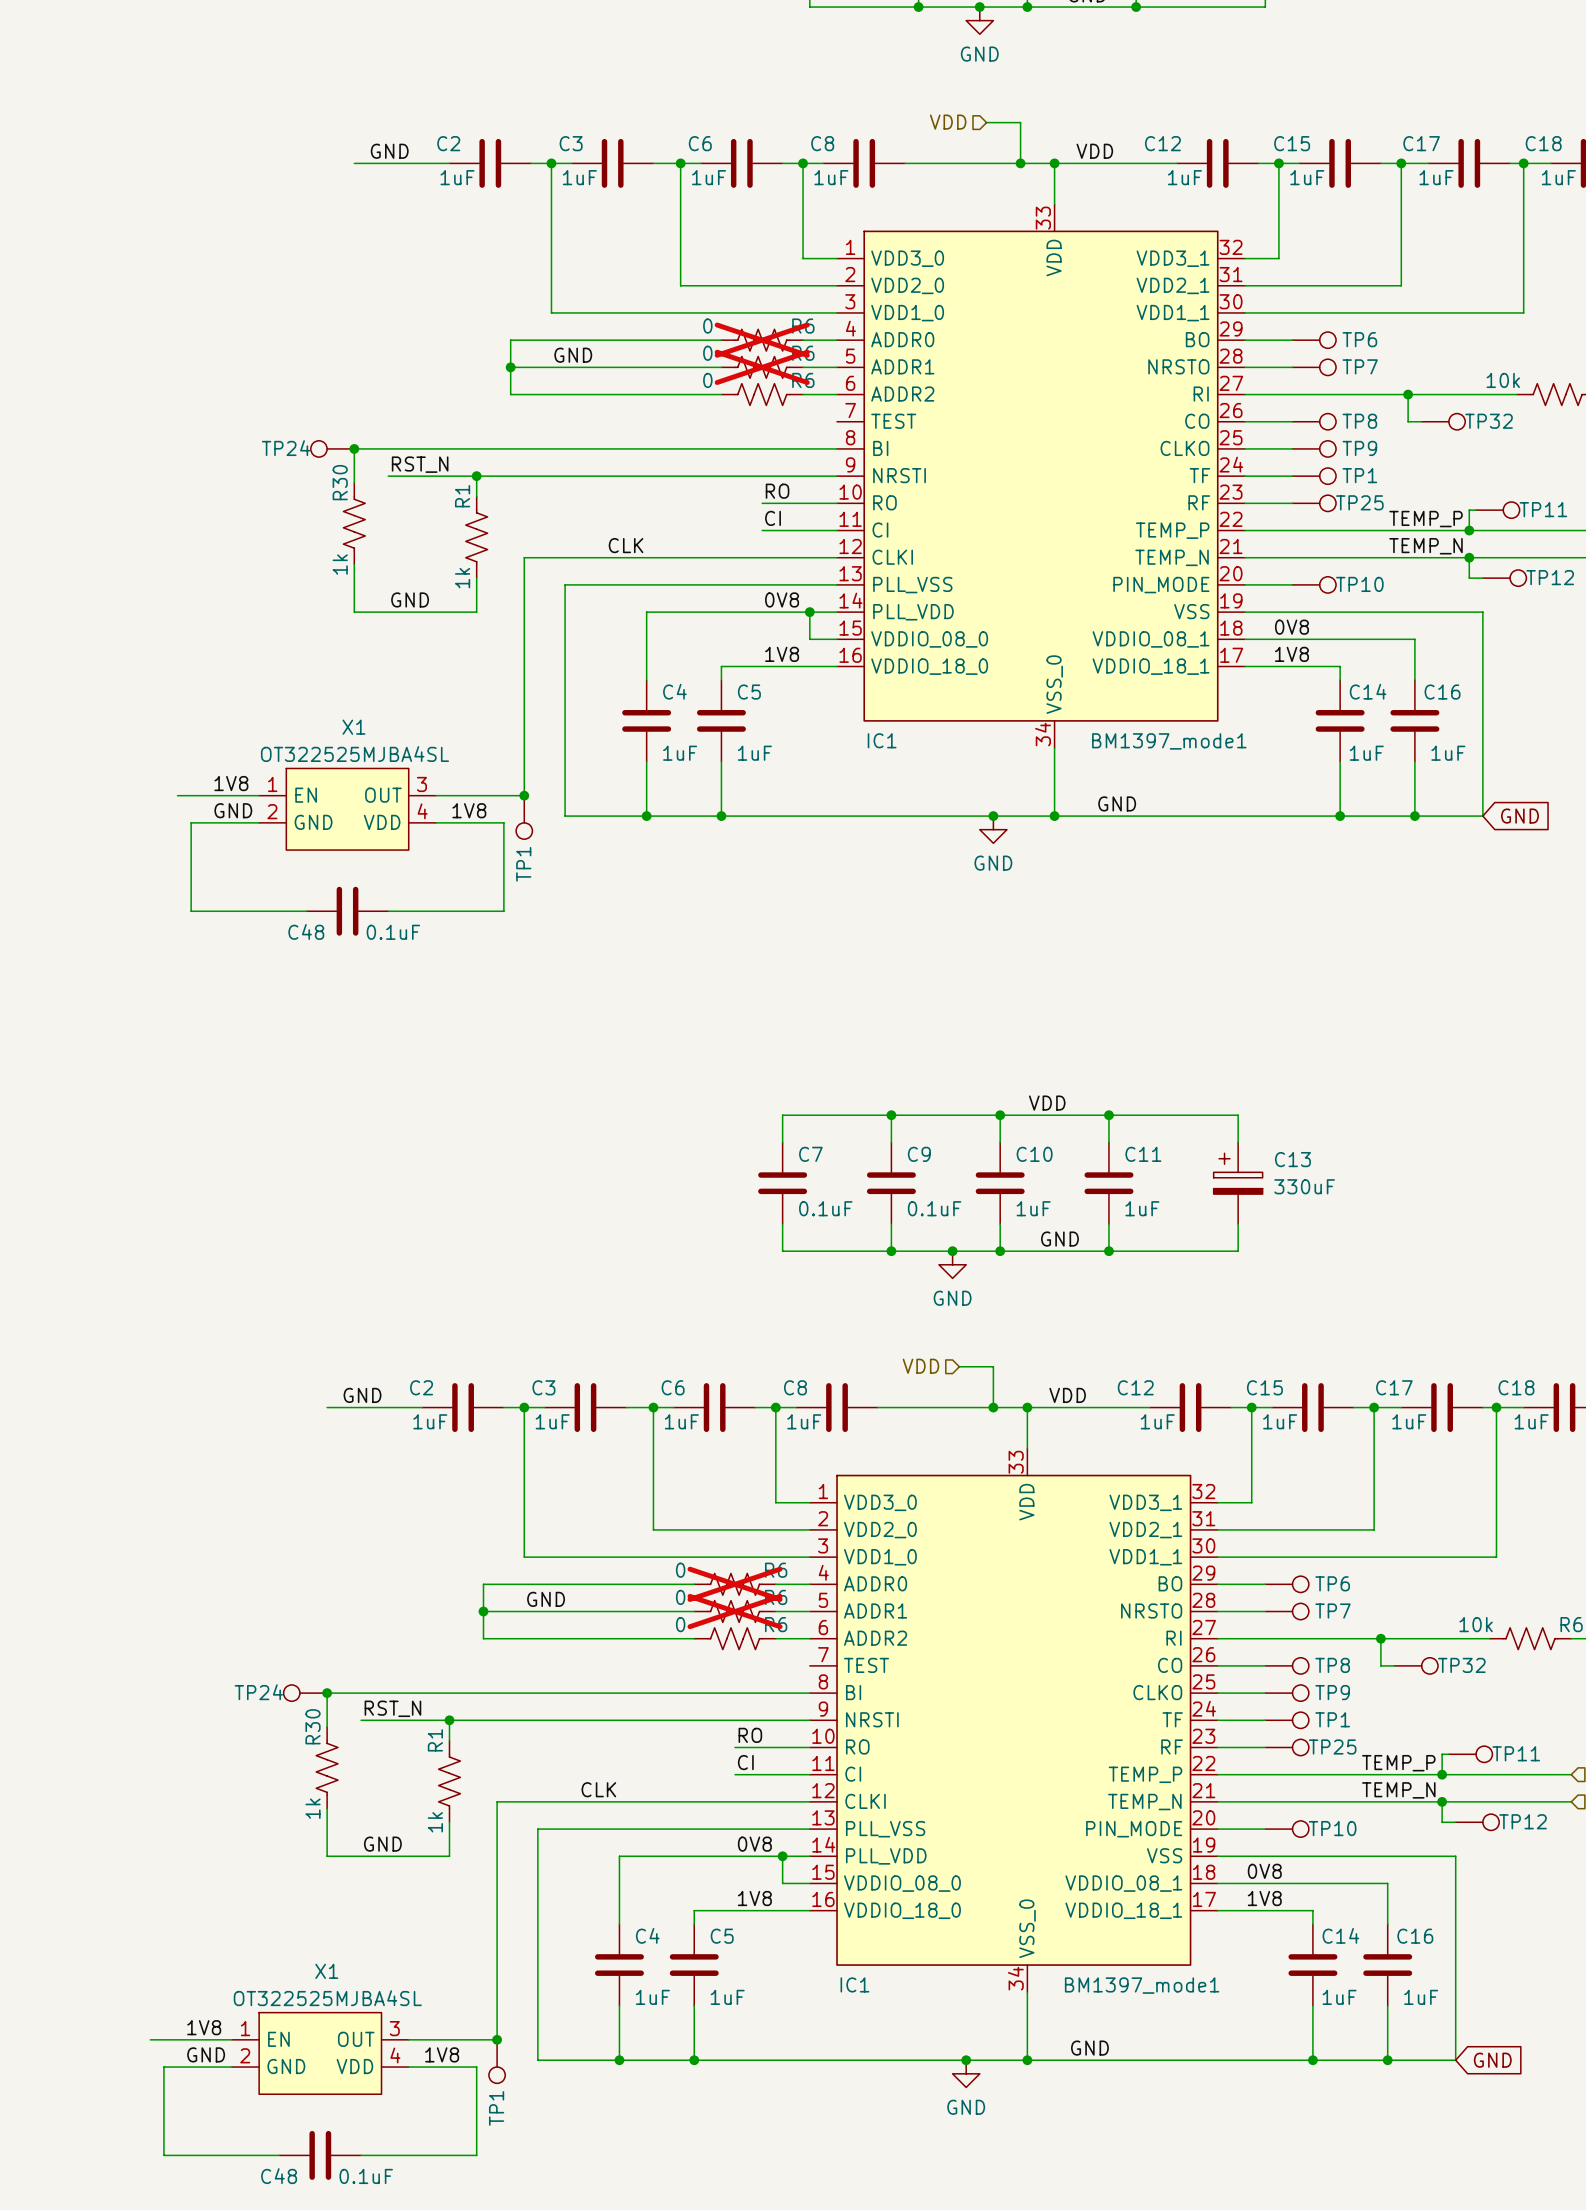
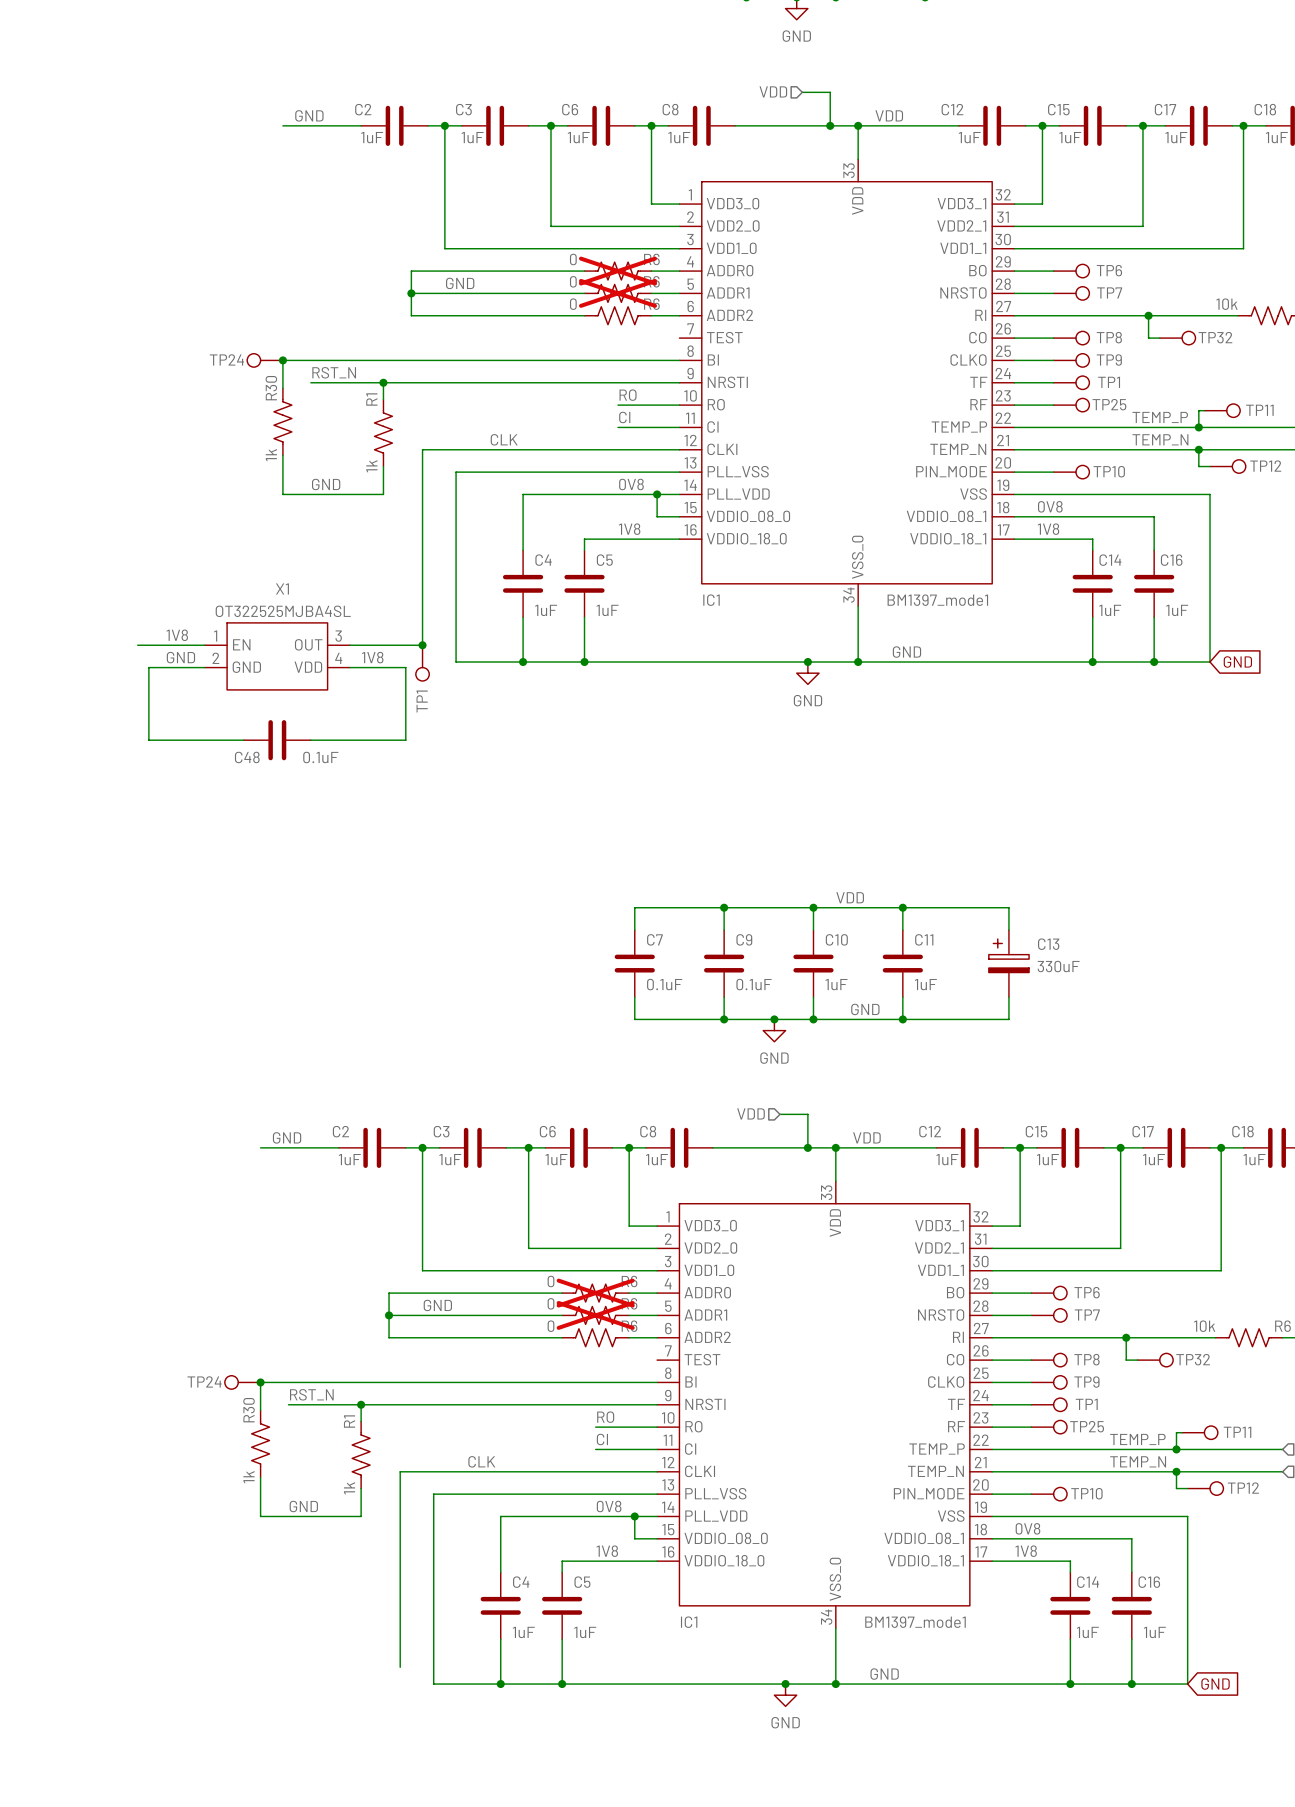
label: 1V8 (204, 2027) -> none
wire: (150, 2039) (231, 2039) -> none
wire: (408, 2039) (497, 2039) -> none
junction: (497, 2039) -> none
X1: OT322525MJBA4SL (320, 2053) -> none
label: GND (206, 2054) -> none
label: 1V8 (442, 2054) -> none
TP1: (497, 2061) -> none
wire: (231, 2067) (163, 2067) (163, 2155) (279, 2155) -> none
wire: (408, 2067) (476, 2067) (476, 2155) (361, 2155) -> none
C48: 0.1uF (320, 2155) -> none

